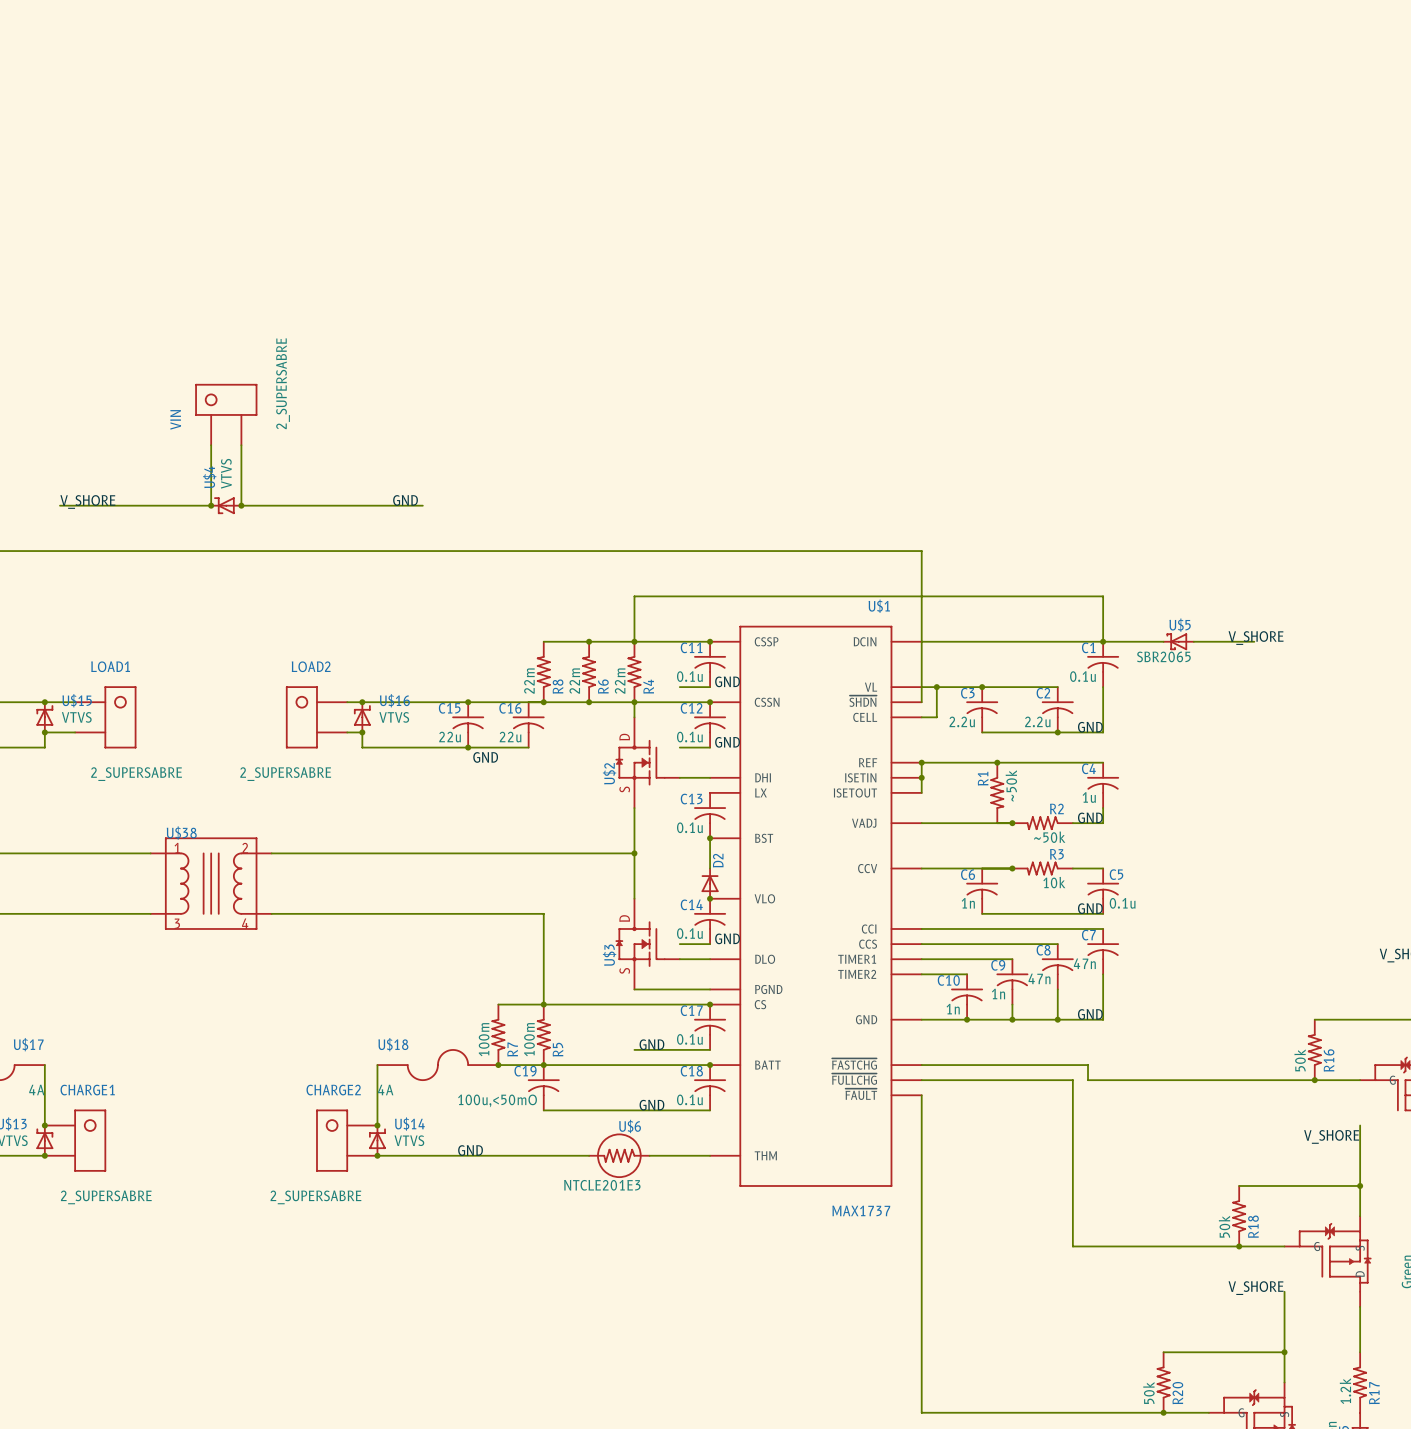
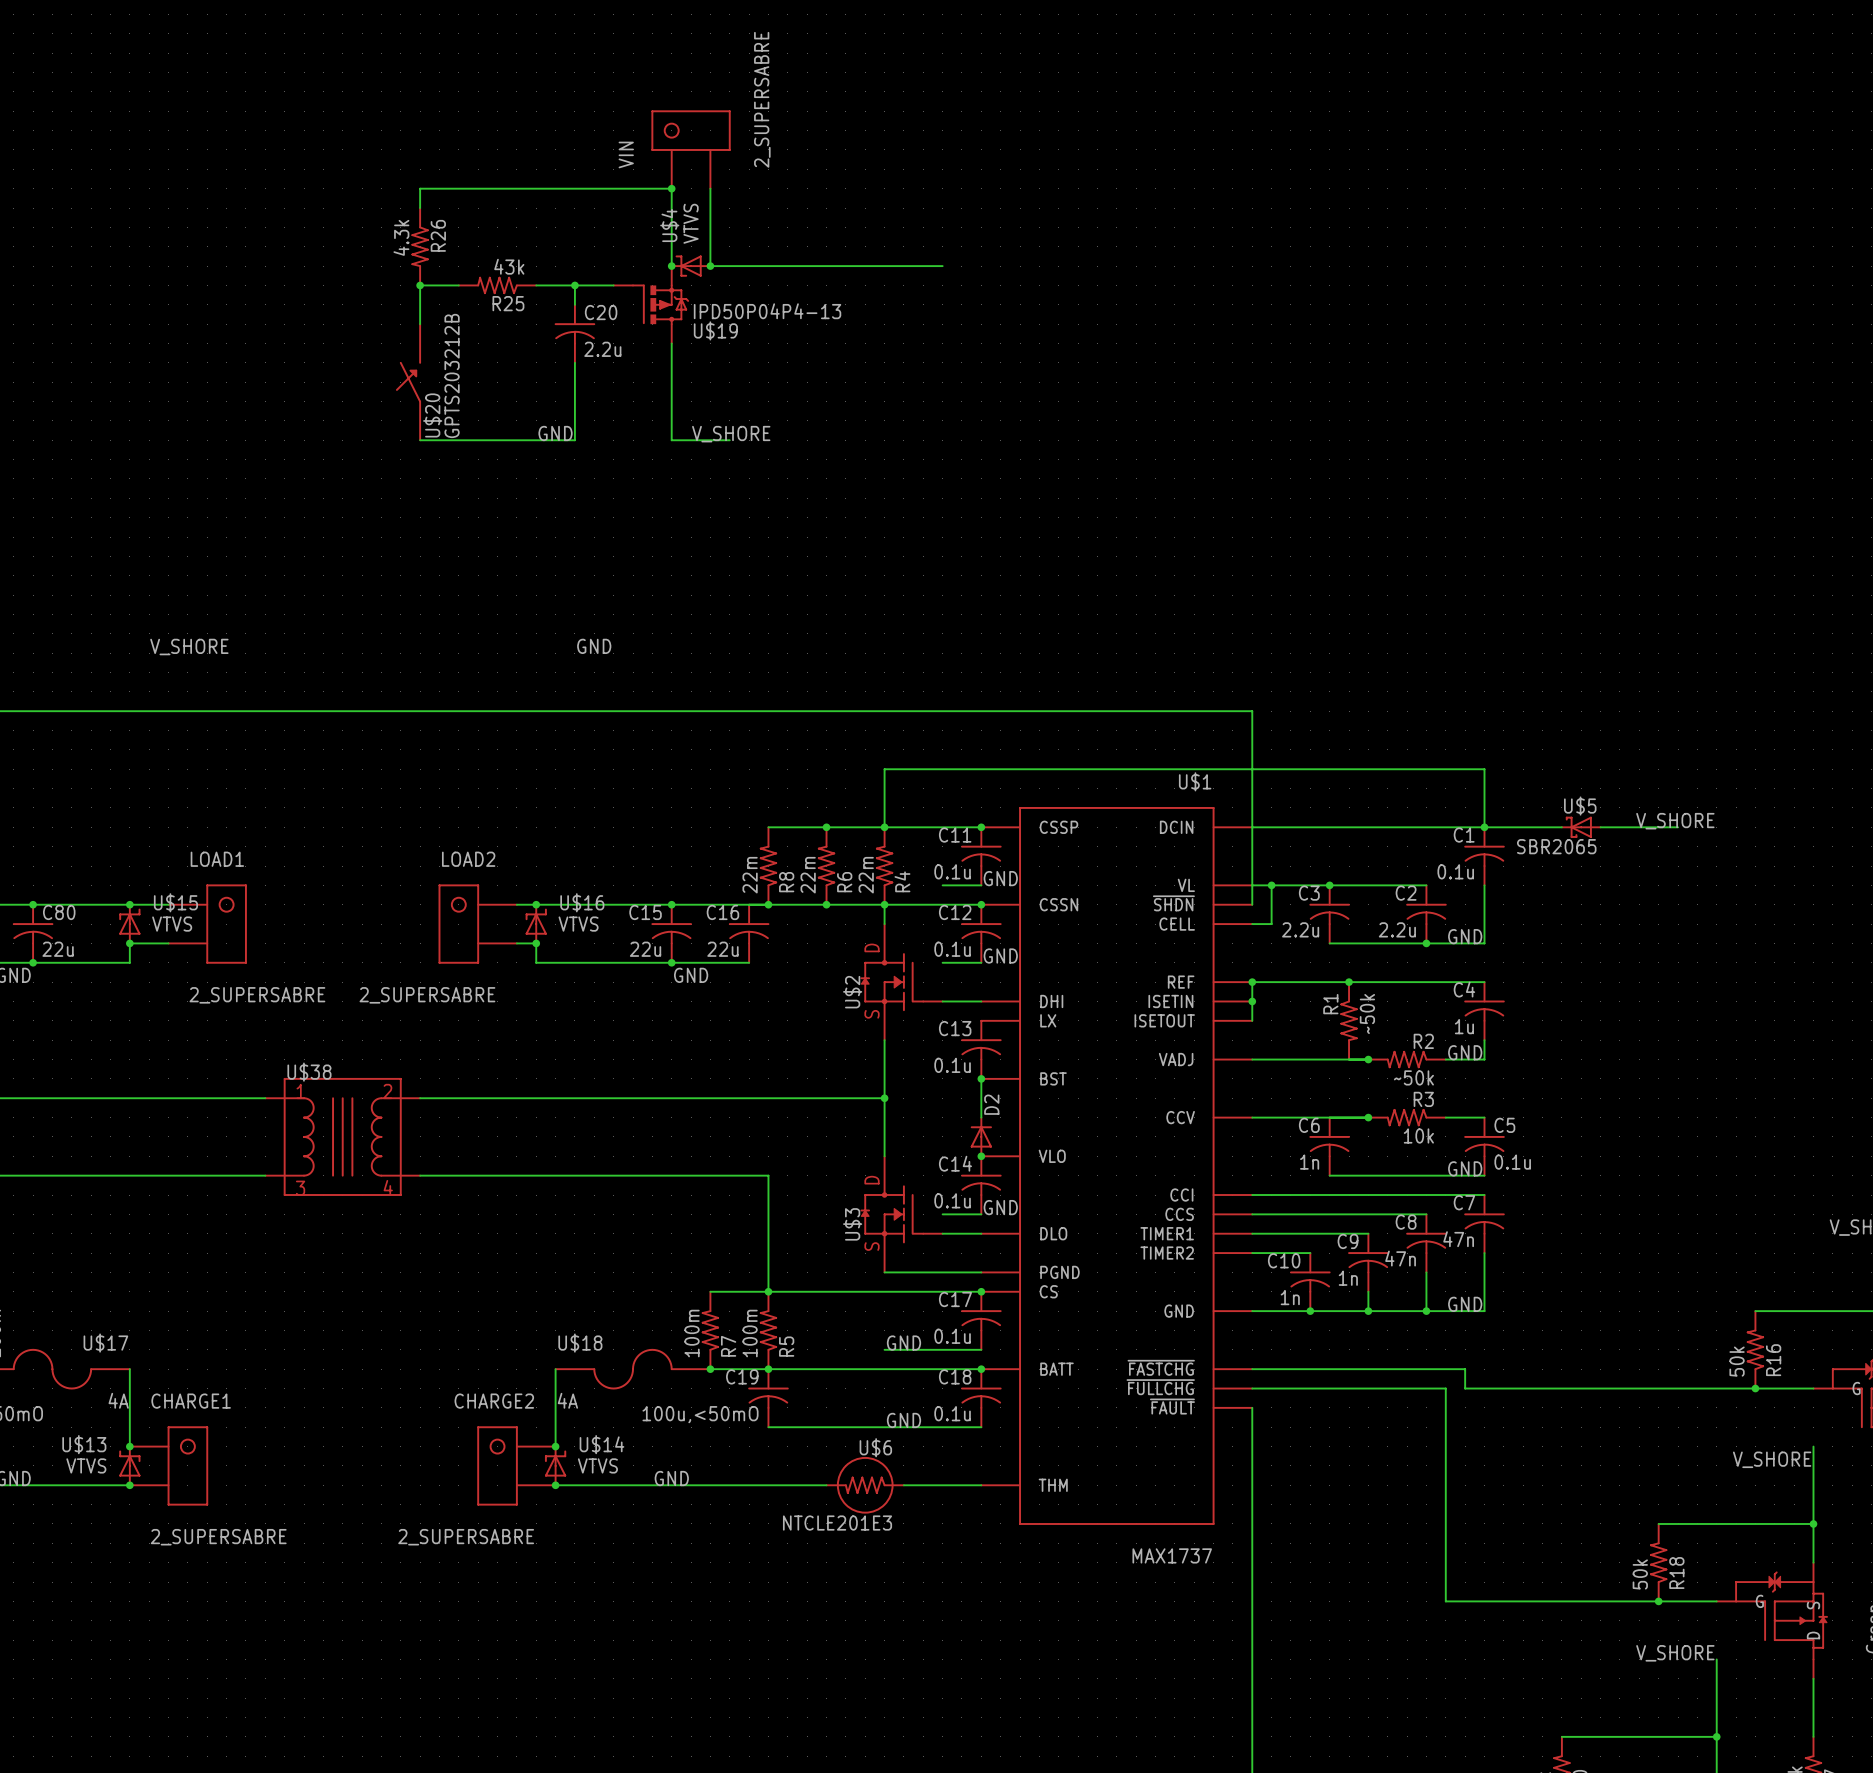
VIN: none -> 2_SUPERSABRE (691, 149)
junction: none -> (671, 188)
wire: none -> (710, 188) (710, 266) (942, 266)
wire: none -> (420, 208) (420, 188) (671, 188) (671, 266)
R26: none -> 4.3k (420, 246)
junction: none -> (671, 266)
junction: none -> (710, 266)
junction: none -> (420, 285)
wire: none -> (458, 285) (420, 285) (420, 324)
R25: none -> 43k (497, 285)
wire: none -> (536, 285) (613, 285)
wire: none -> (574, 285) (574, 304)
junction: none -> (574, 285)
U$19: none -> IPD50P04P4-13 (651, 304)
C20: none -> 2.2u (574, 333)
wire: none -> (671, 343) (671, 440) (729, 440)
wire: none -> (574, 362) (574, 440) (420, 440)
U$20: none -> GPTS203212B (408, 382)
label: none -> GND (555, 433)
label: none -> V_SHORE (731, 434)
VIN: 2_SUPERSABRE (226, 414) -> none
wire: (211, 445) (211, 505) (59, 505) -> none
wire: (241, 445) (241, 505) (422, 505) -> none
junction: (211, 505) -> none
U$4 position: (226, 505) -> (691, 266)
junction: (241, 505) -> none

